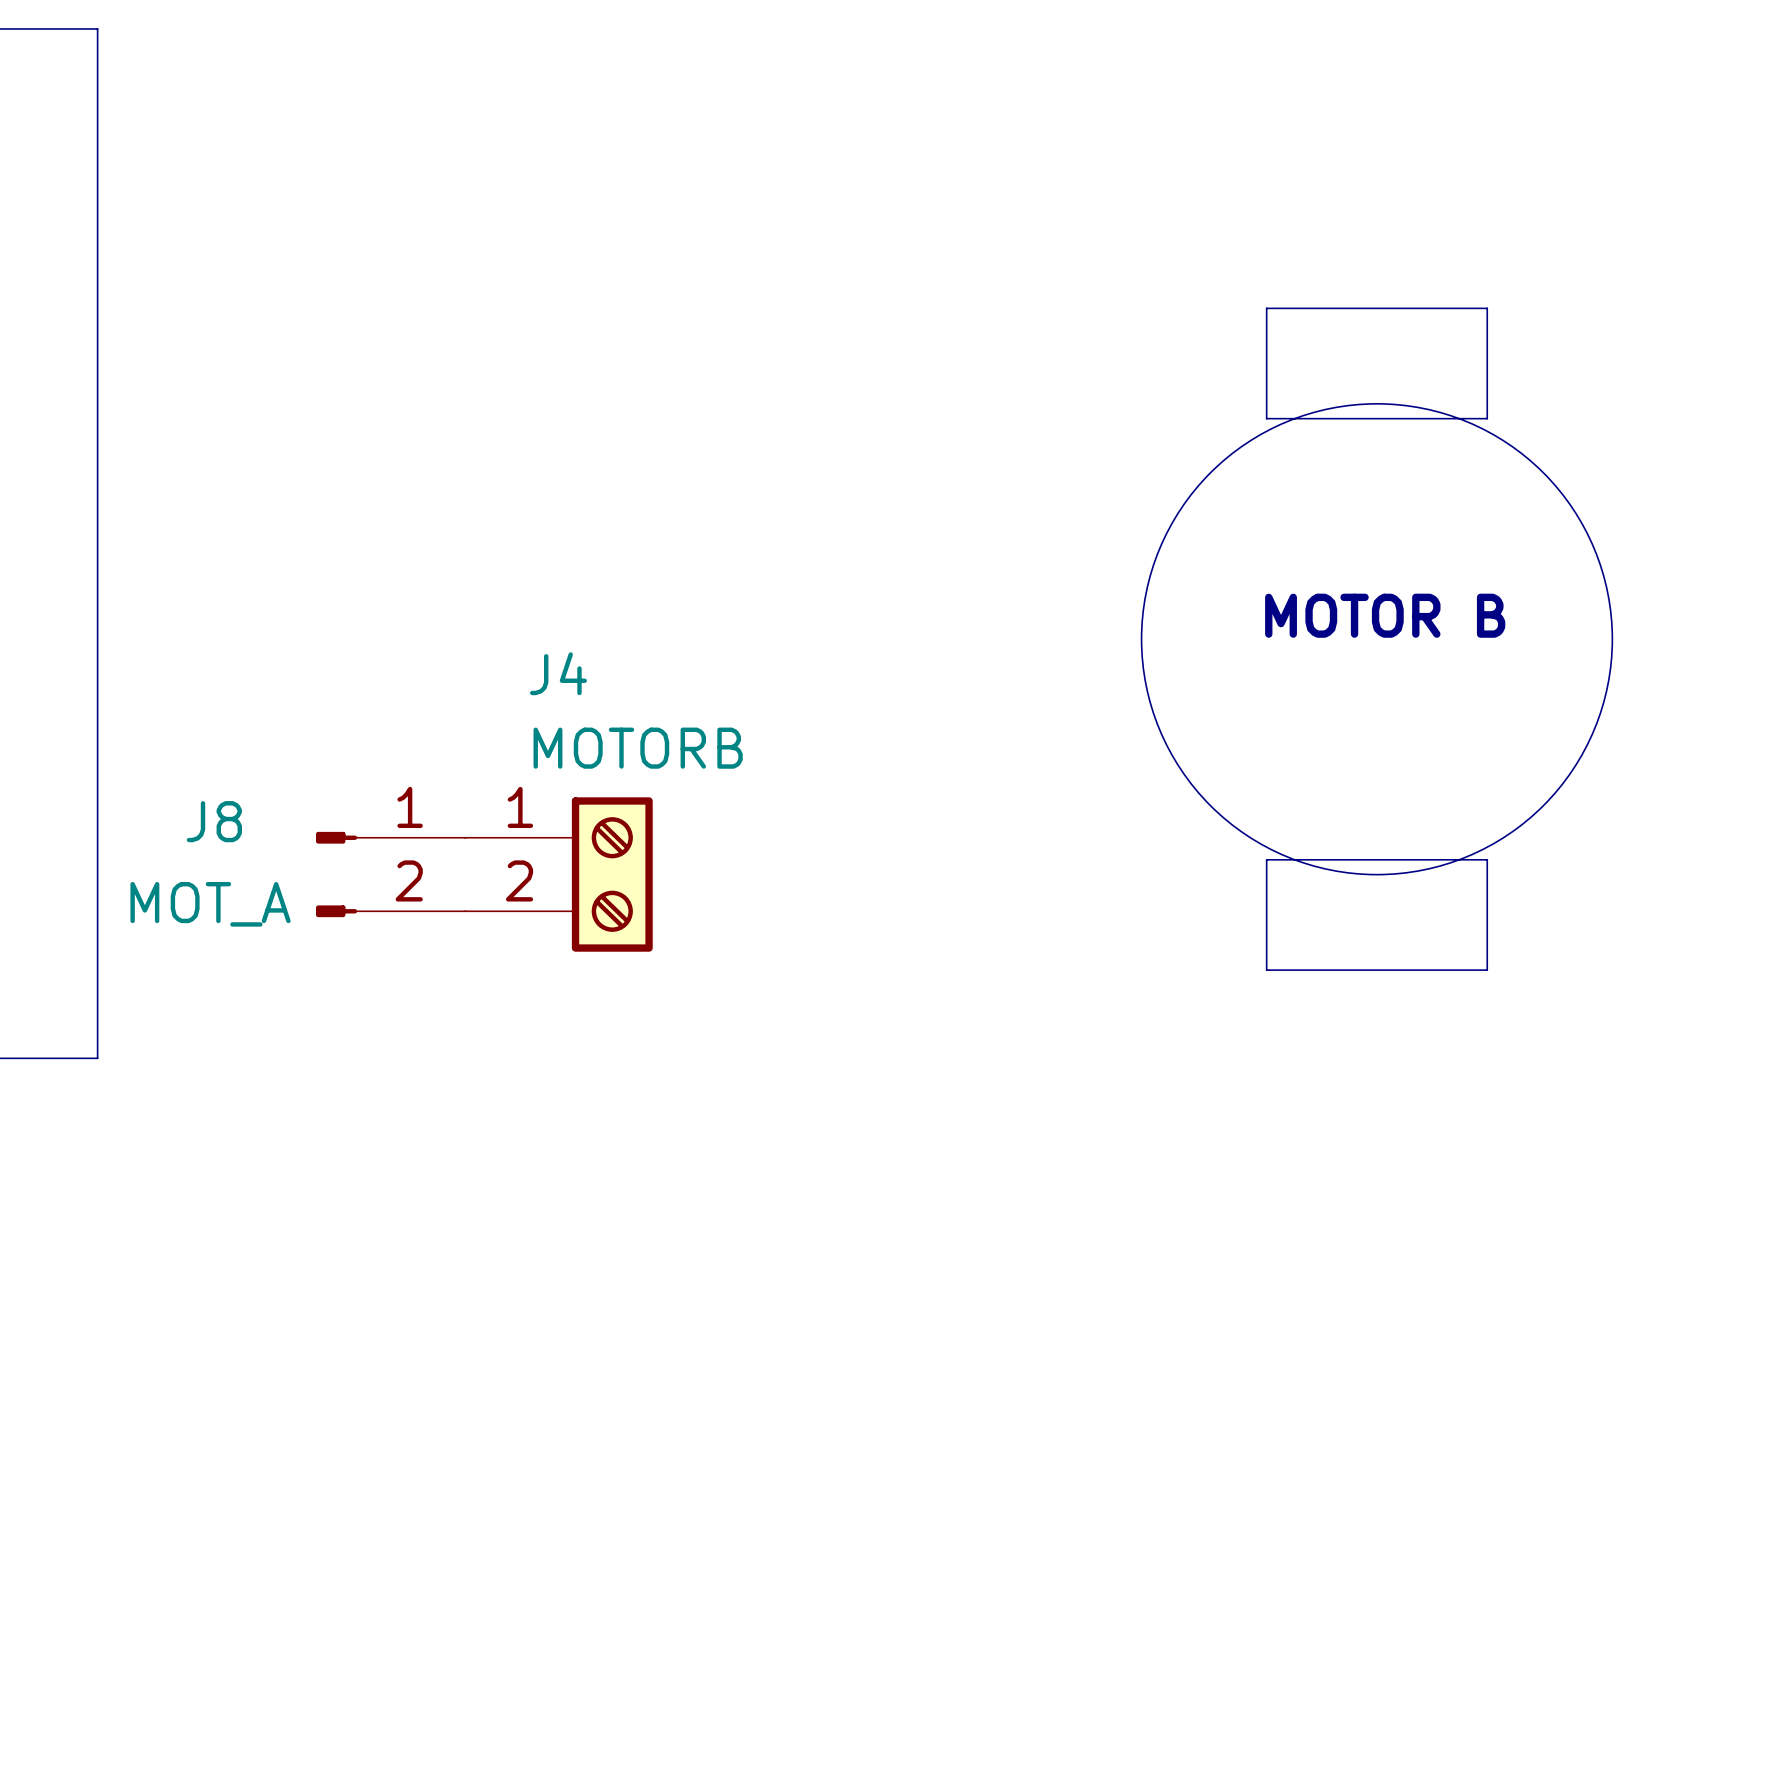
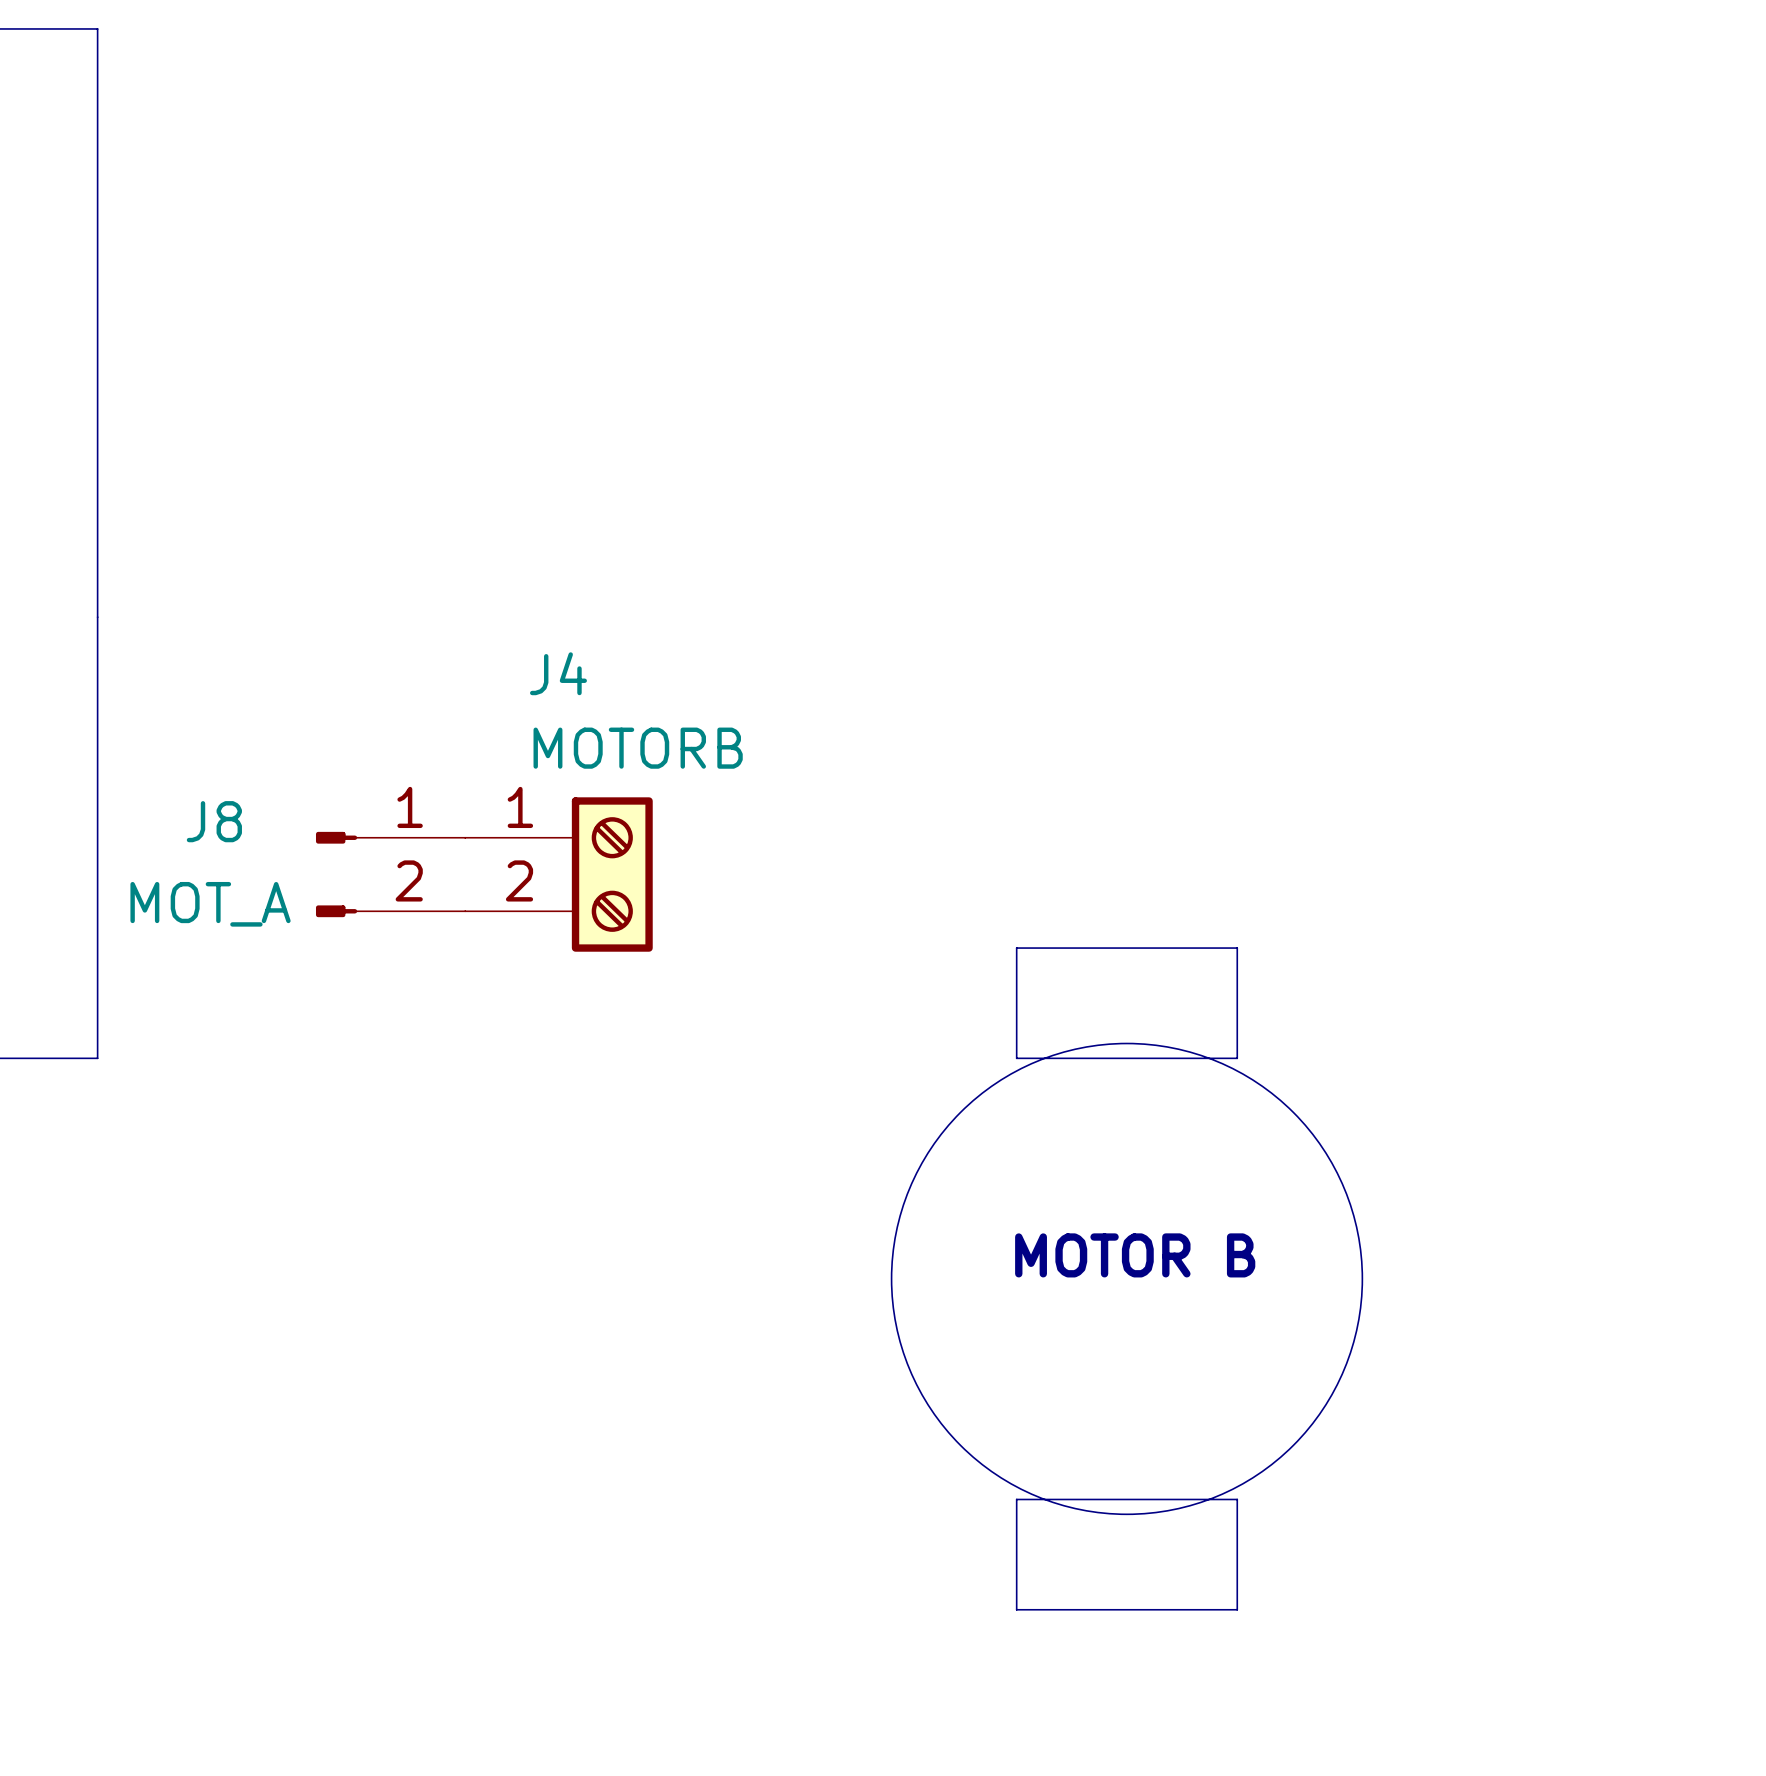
line: (1266, 308) (1266, 418) (1487, 418) (1487, 308) (1266, 308) -> (1016, 948) (1016, 1058) (1237, 1058) (1237, 948) (1016, 948)
text position: MOTOR B (1385, 615) -> MOTOR B (1135, 1255)
drawing position: (1376, 639) -> (1126, 1278)
line: (1266, 859) (1487, 859) (1487, 970) (1266, 970) (1266, 859) -> (1016, 1499) (1237, 1499) (1237, 1609) (1016, 1609) (1016, 1499)

